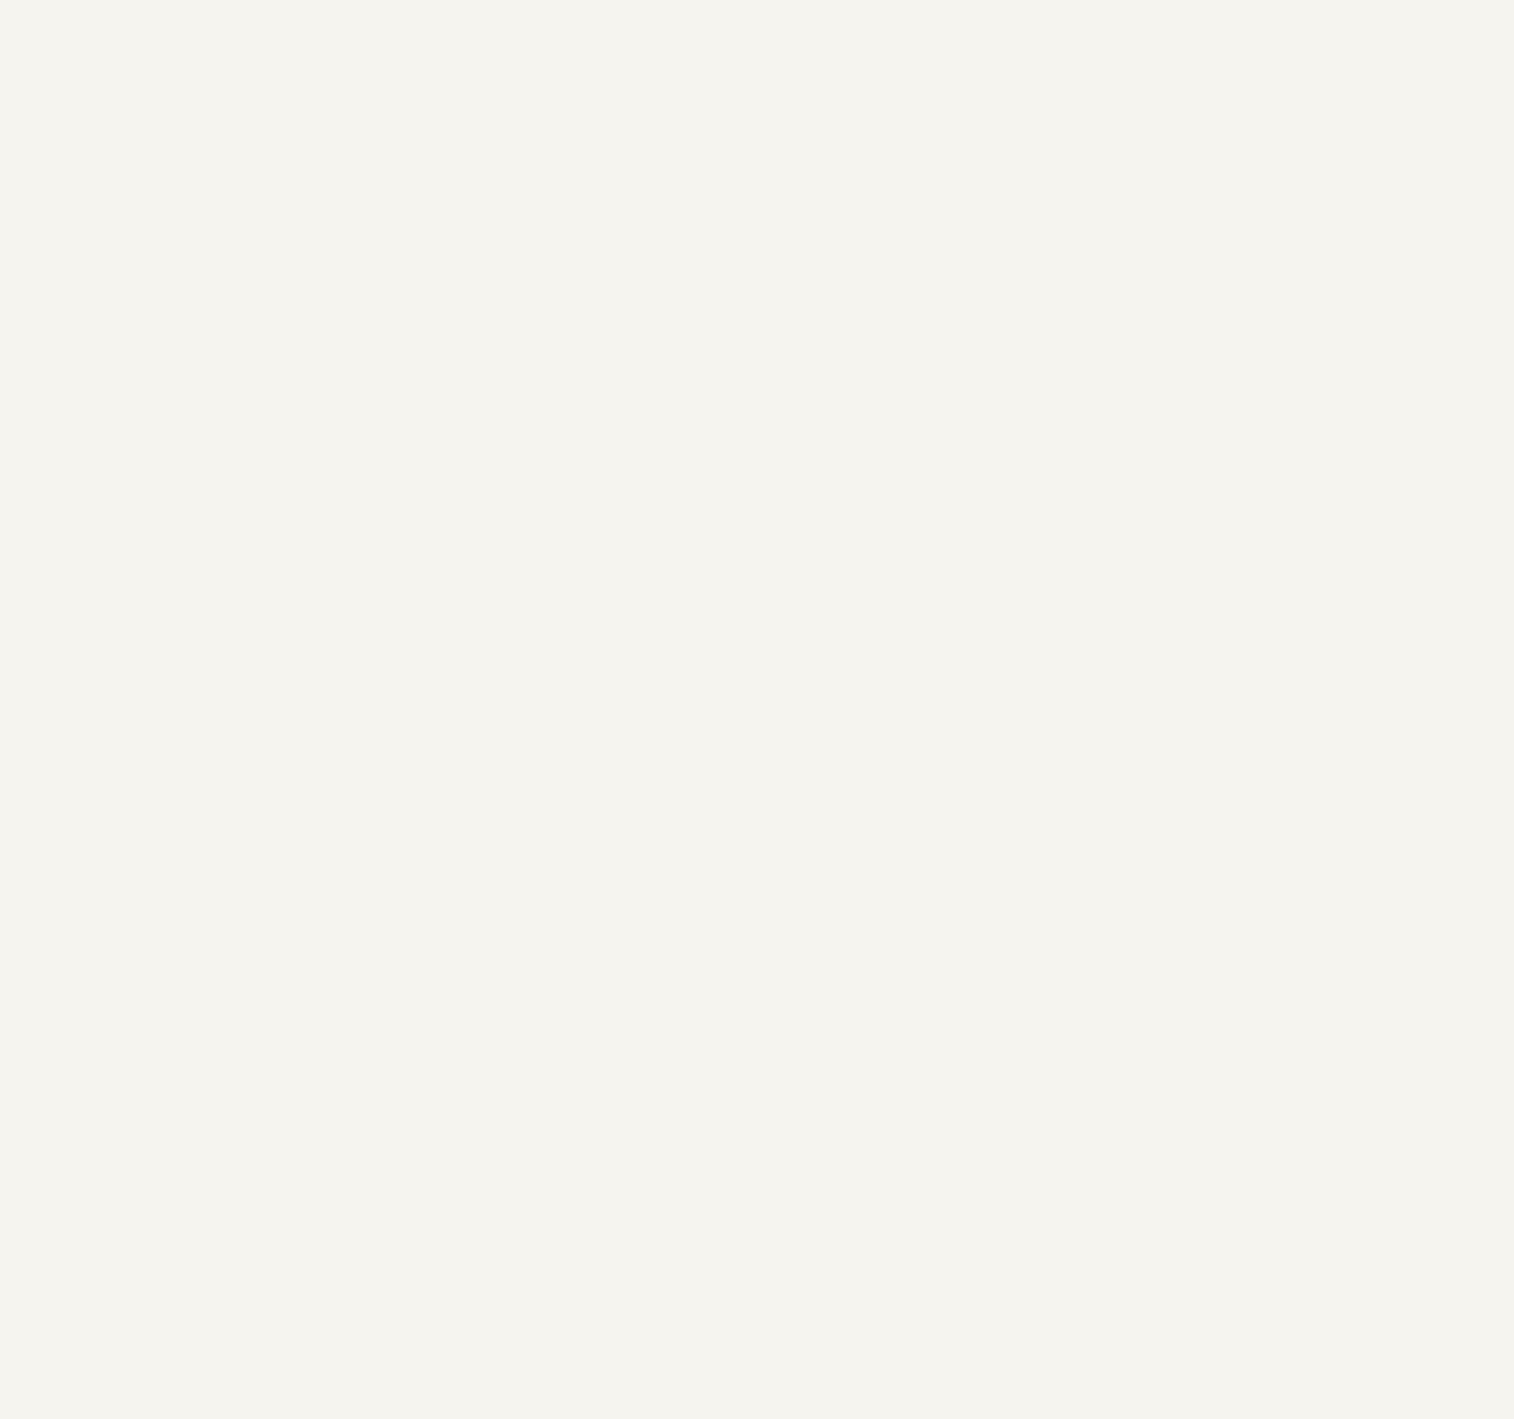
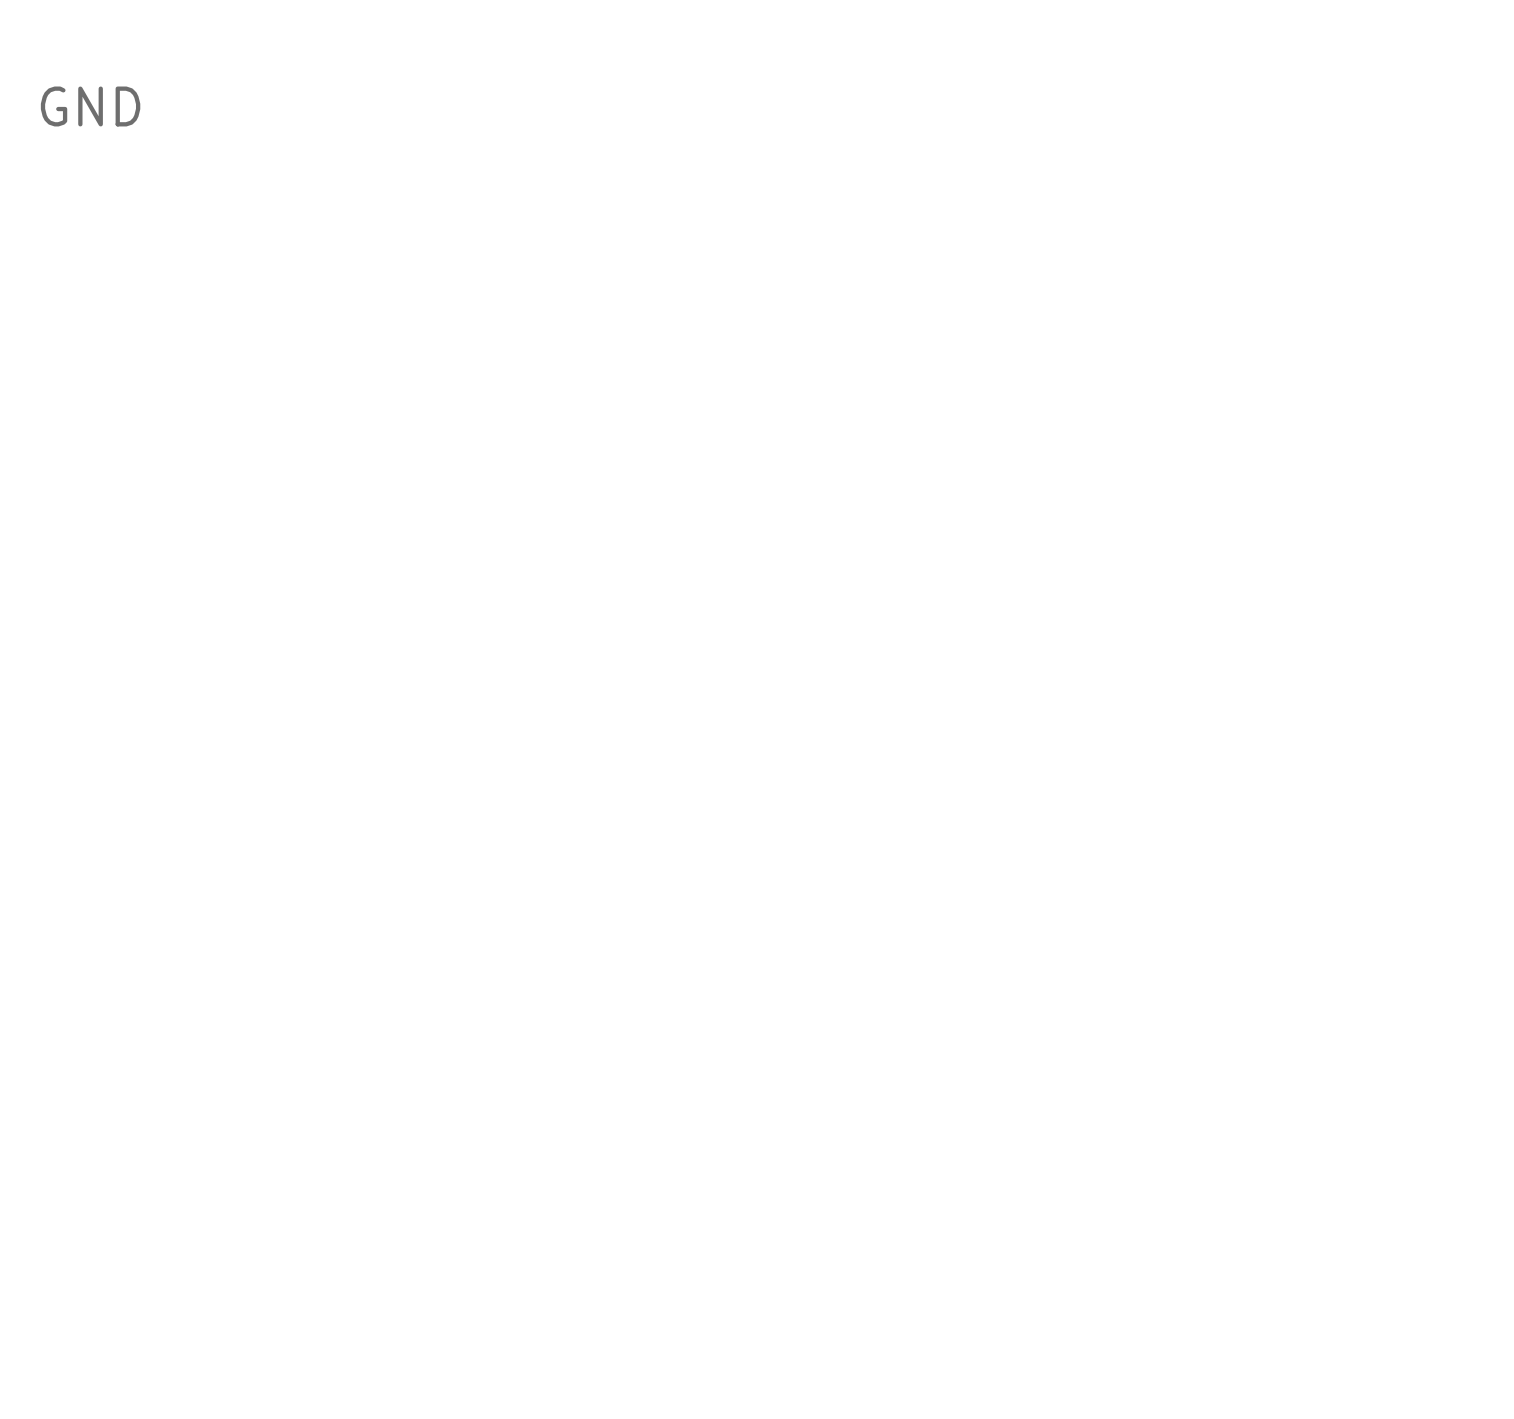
label: none -> GND (90, 106)

